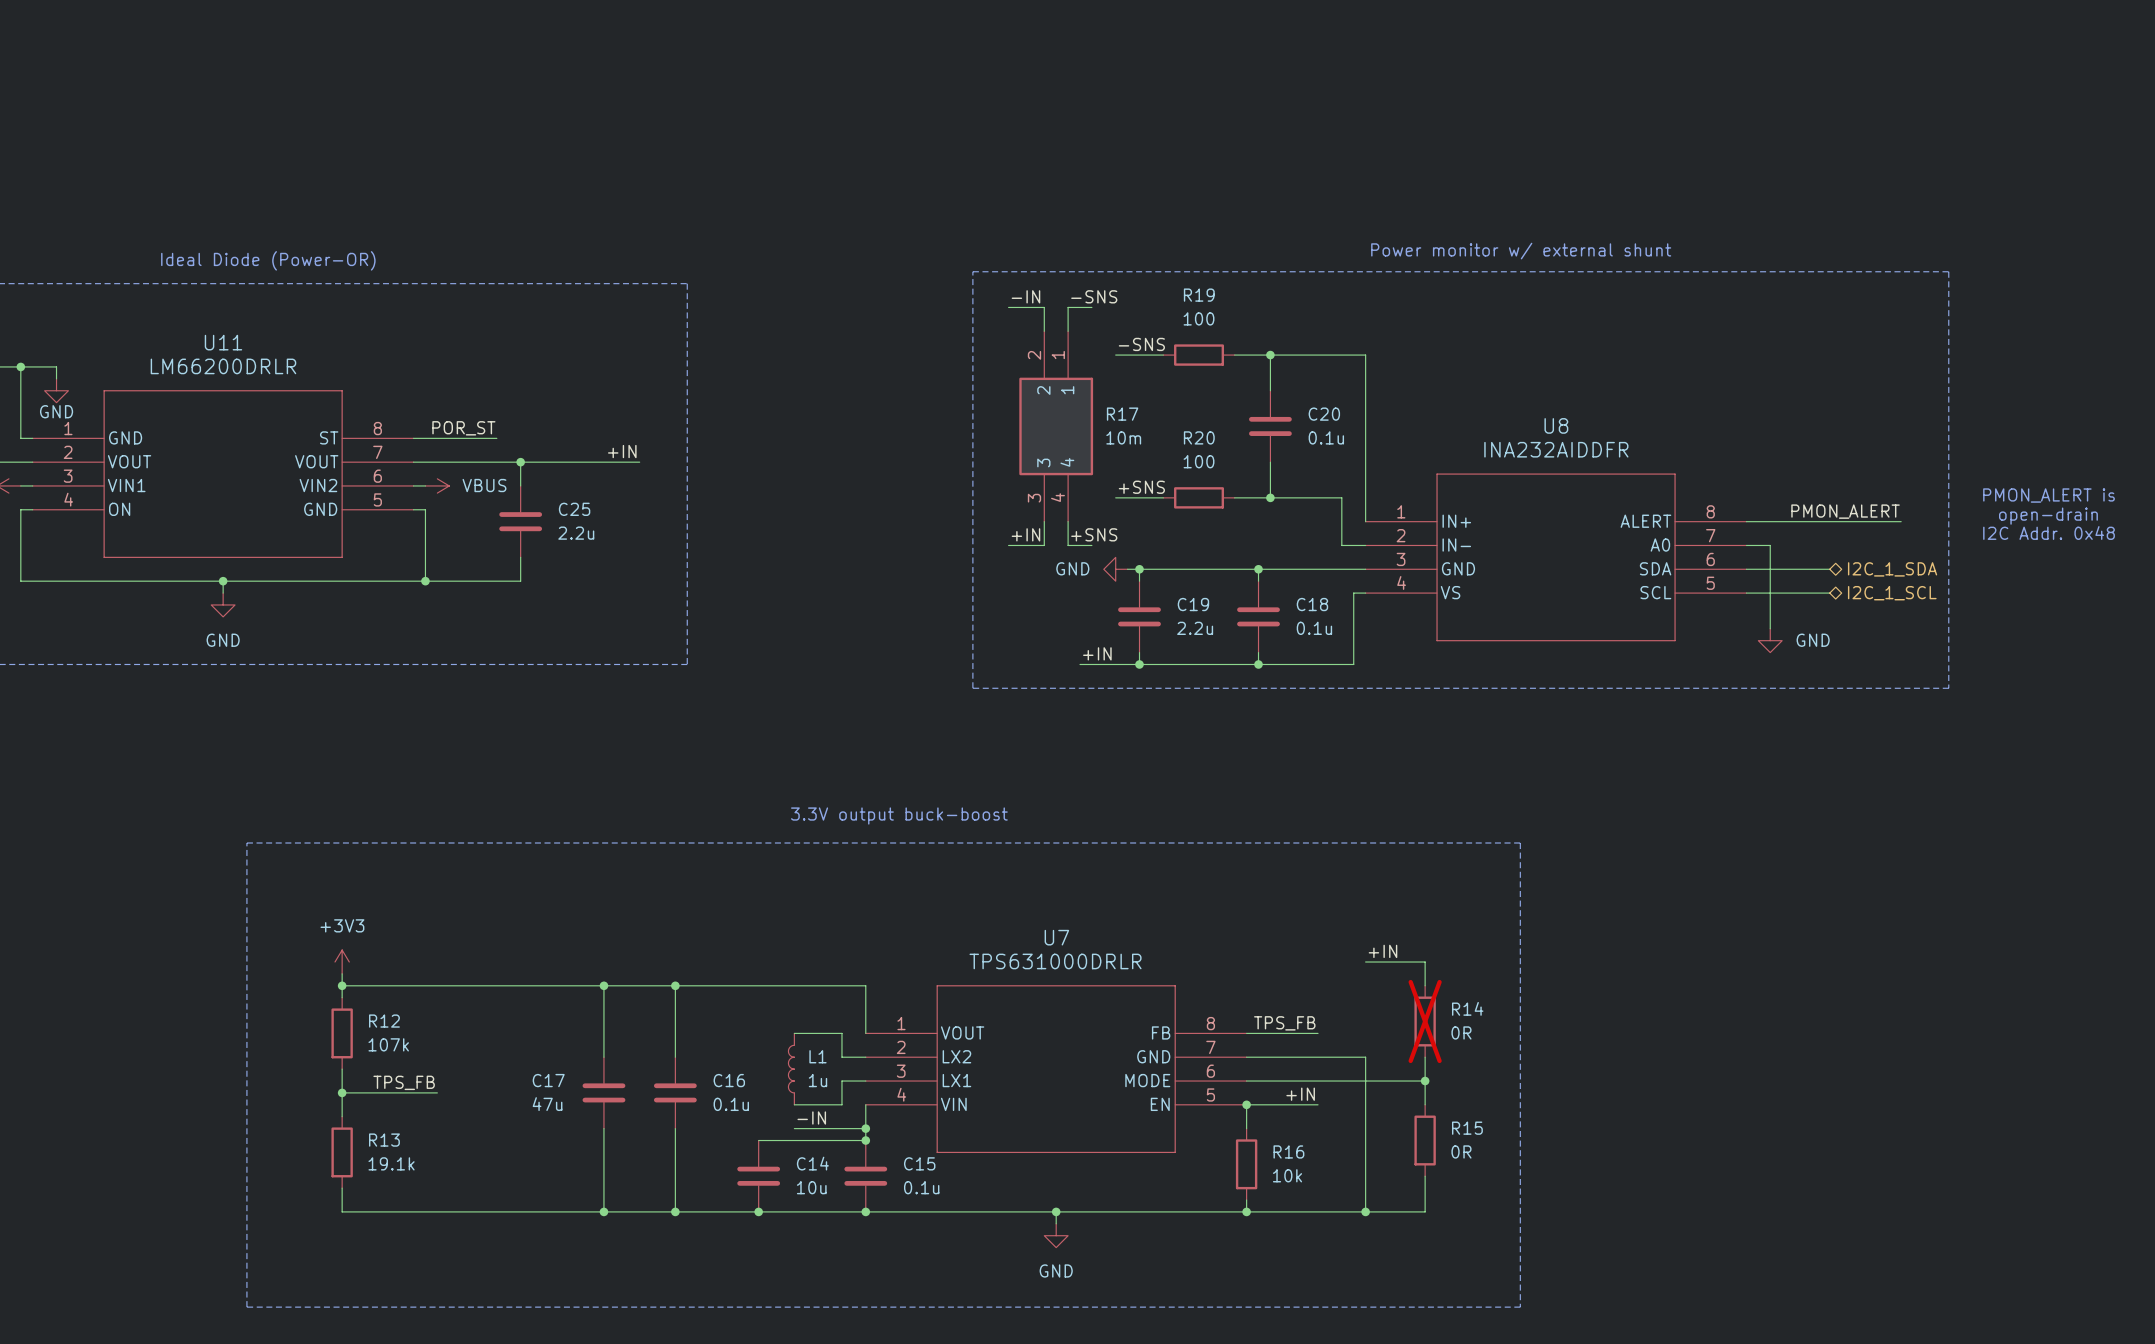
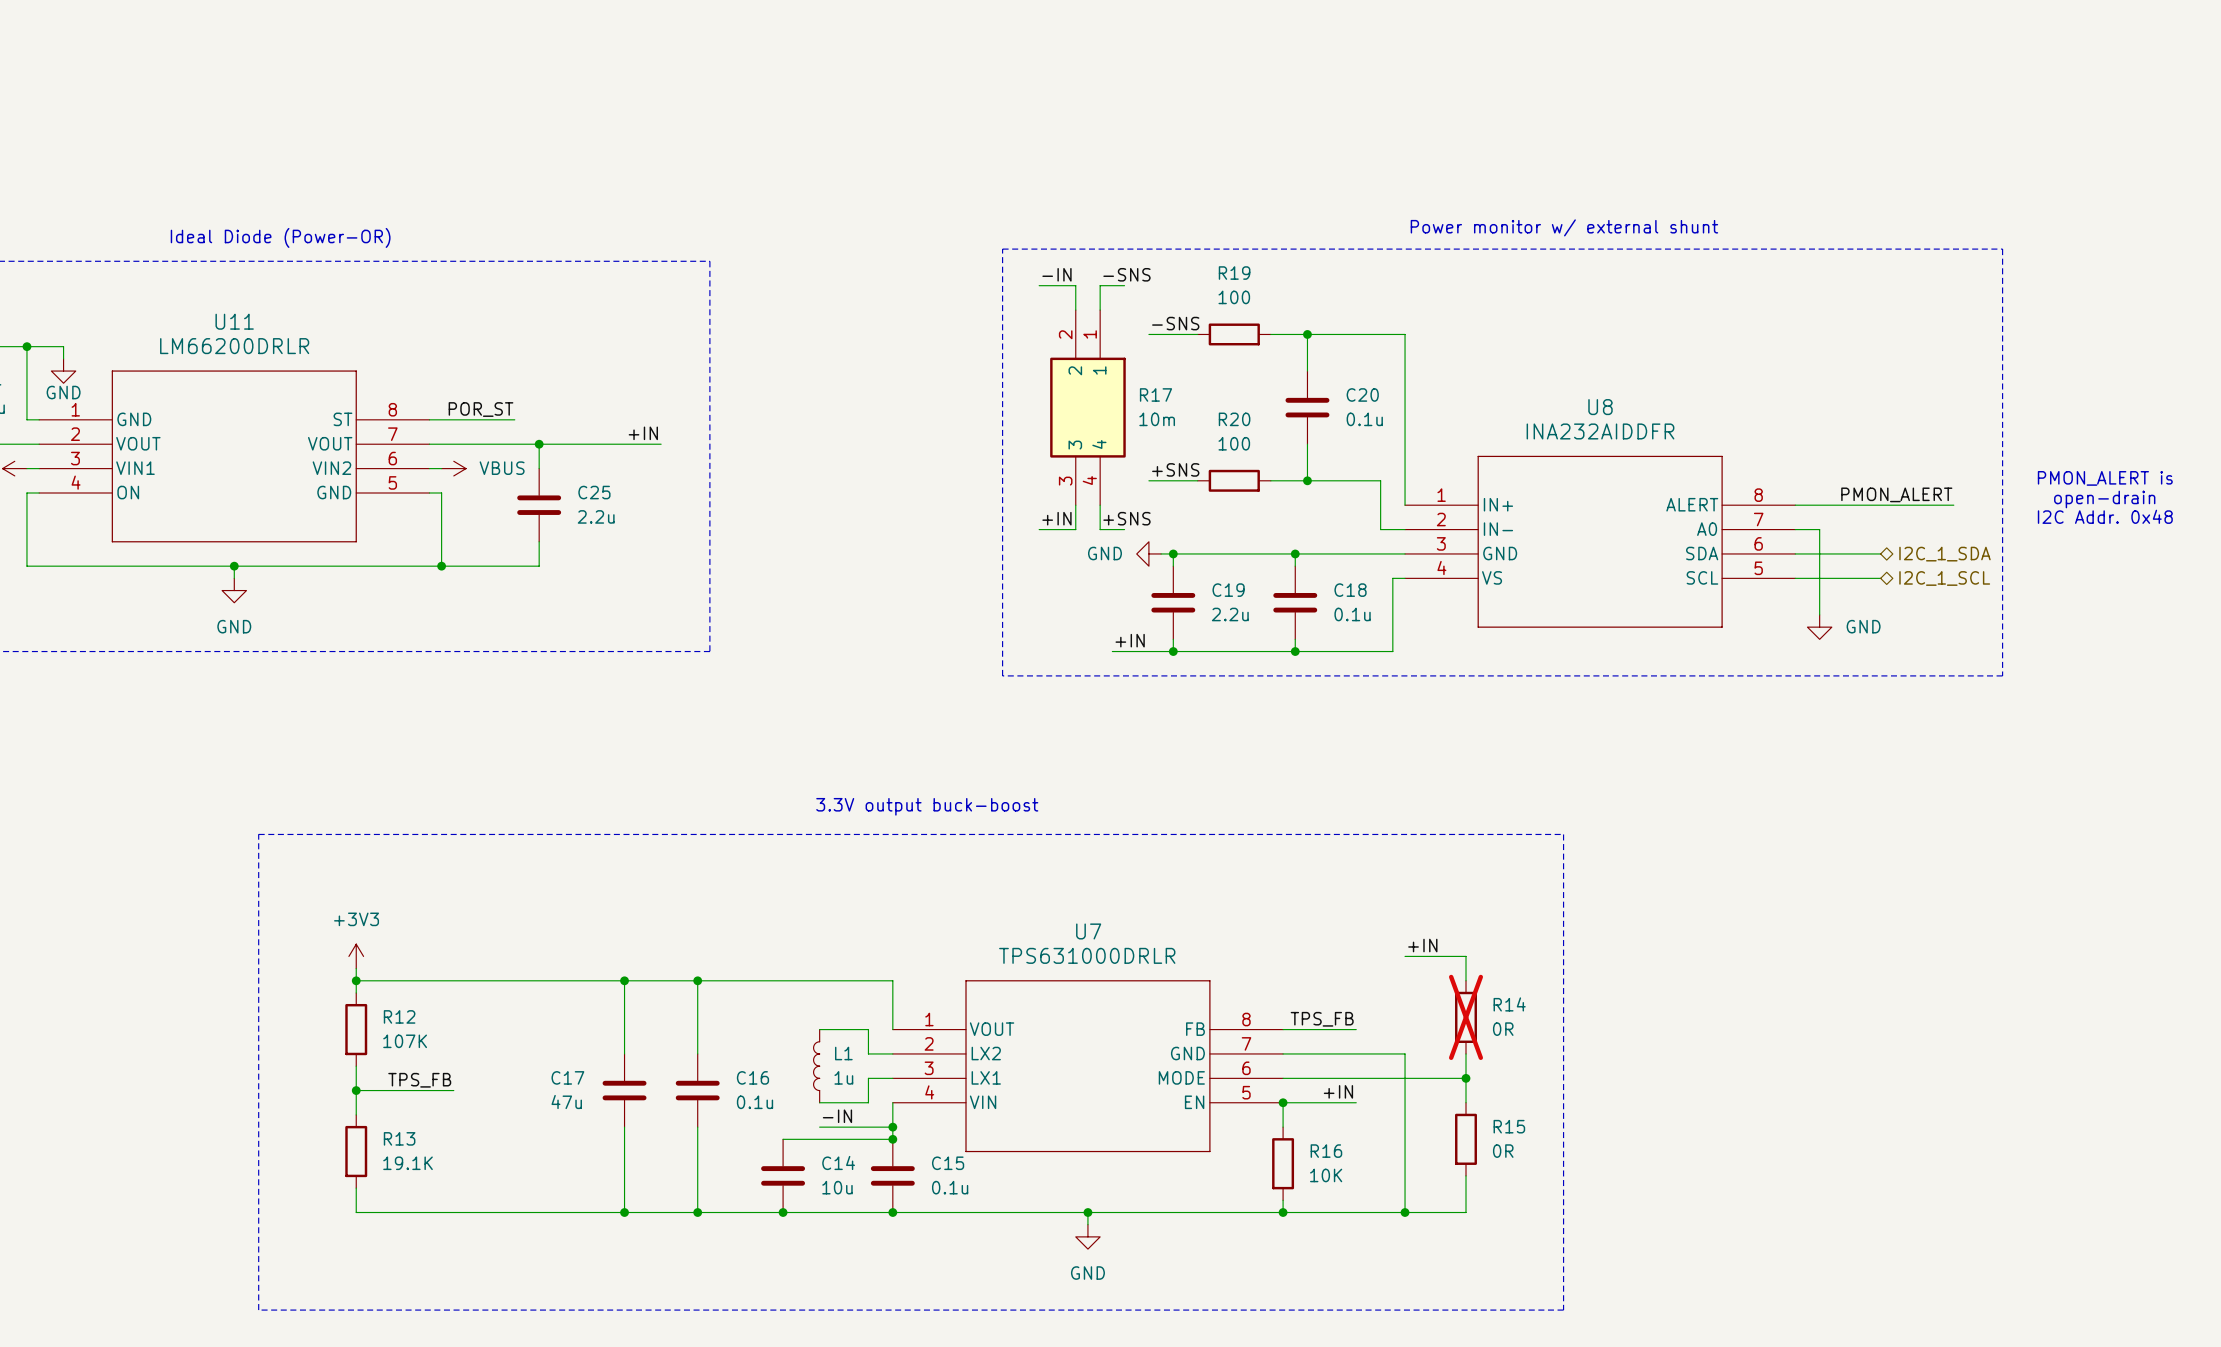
R12 value: 107k (388, 1044) -> 107K (405, 1041)
R13 value: 19.1k (391, 1163) -> 19.1K (408, 1163)
R16 value: 10k (1287, 1175) -> 10K (1326, 1175)

